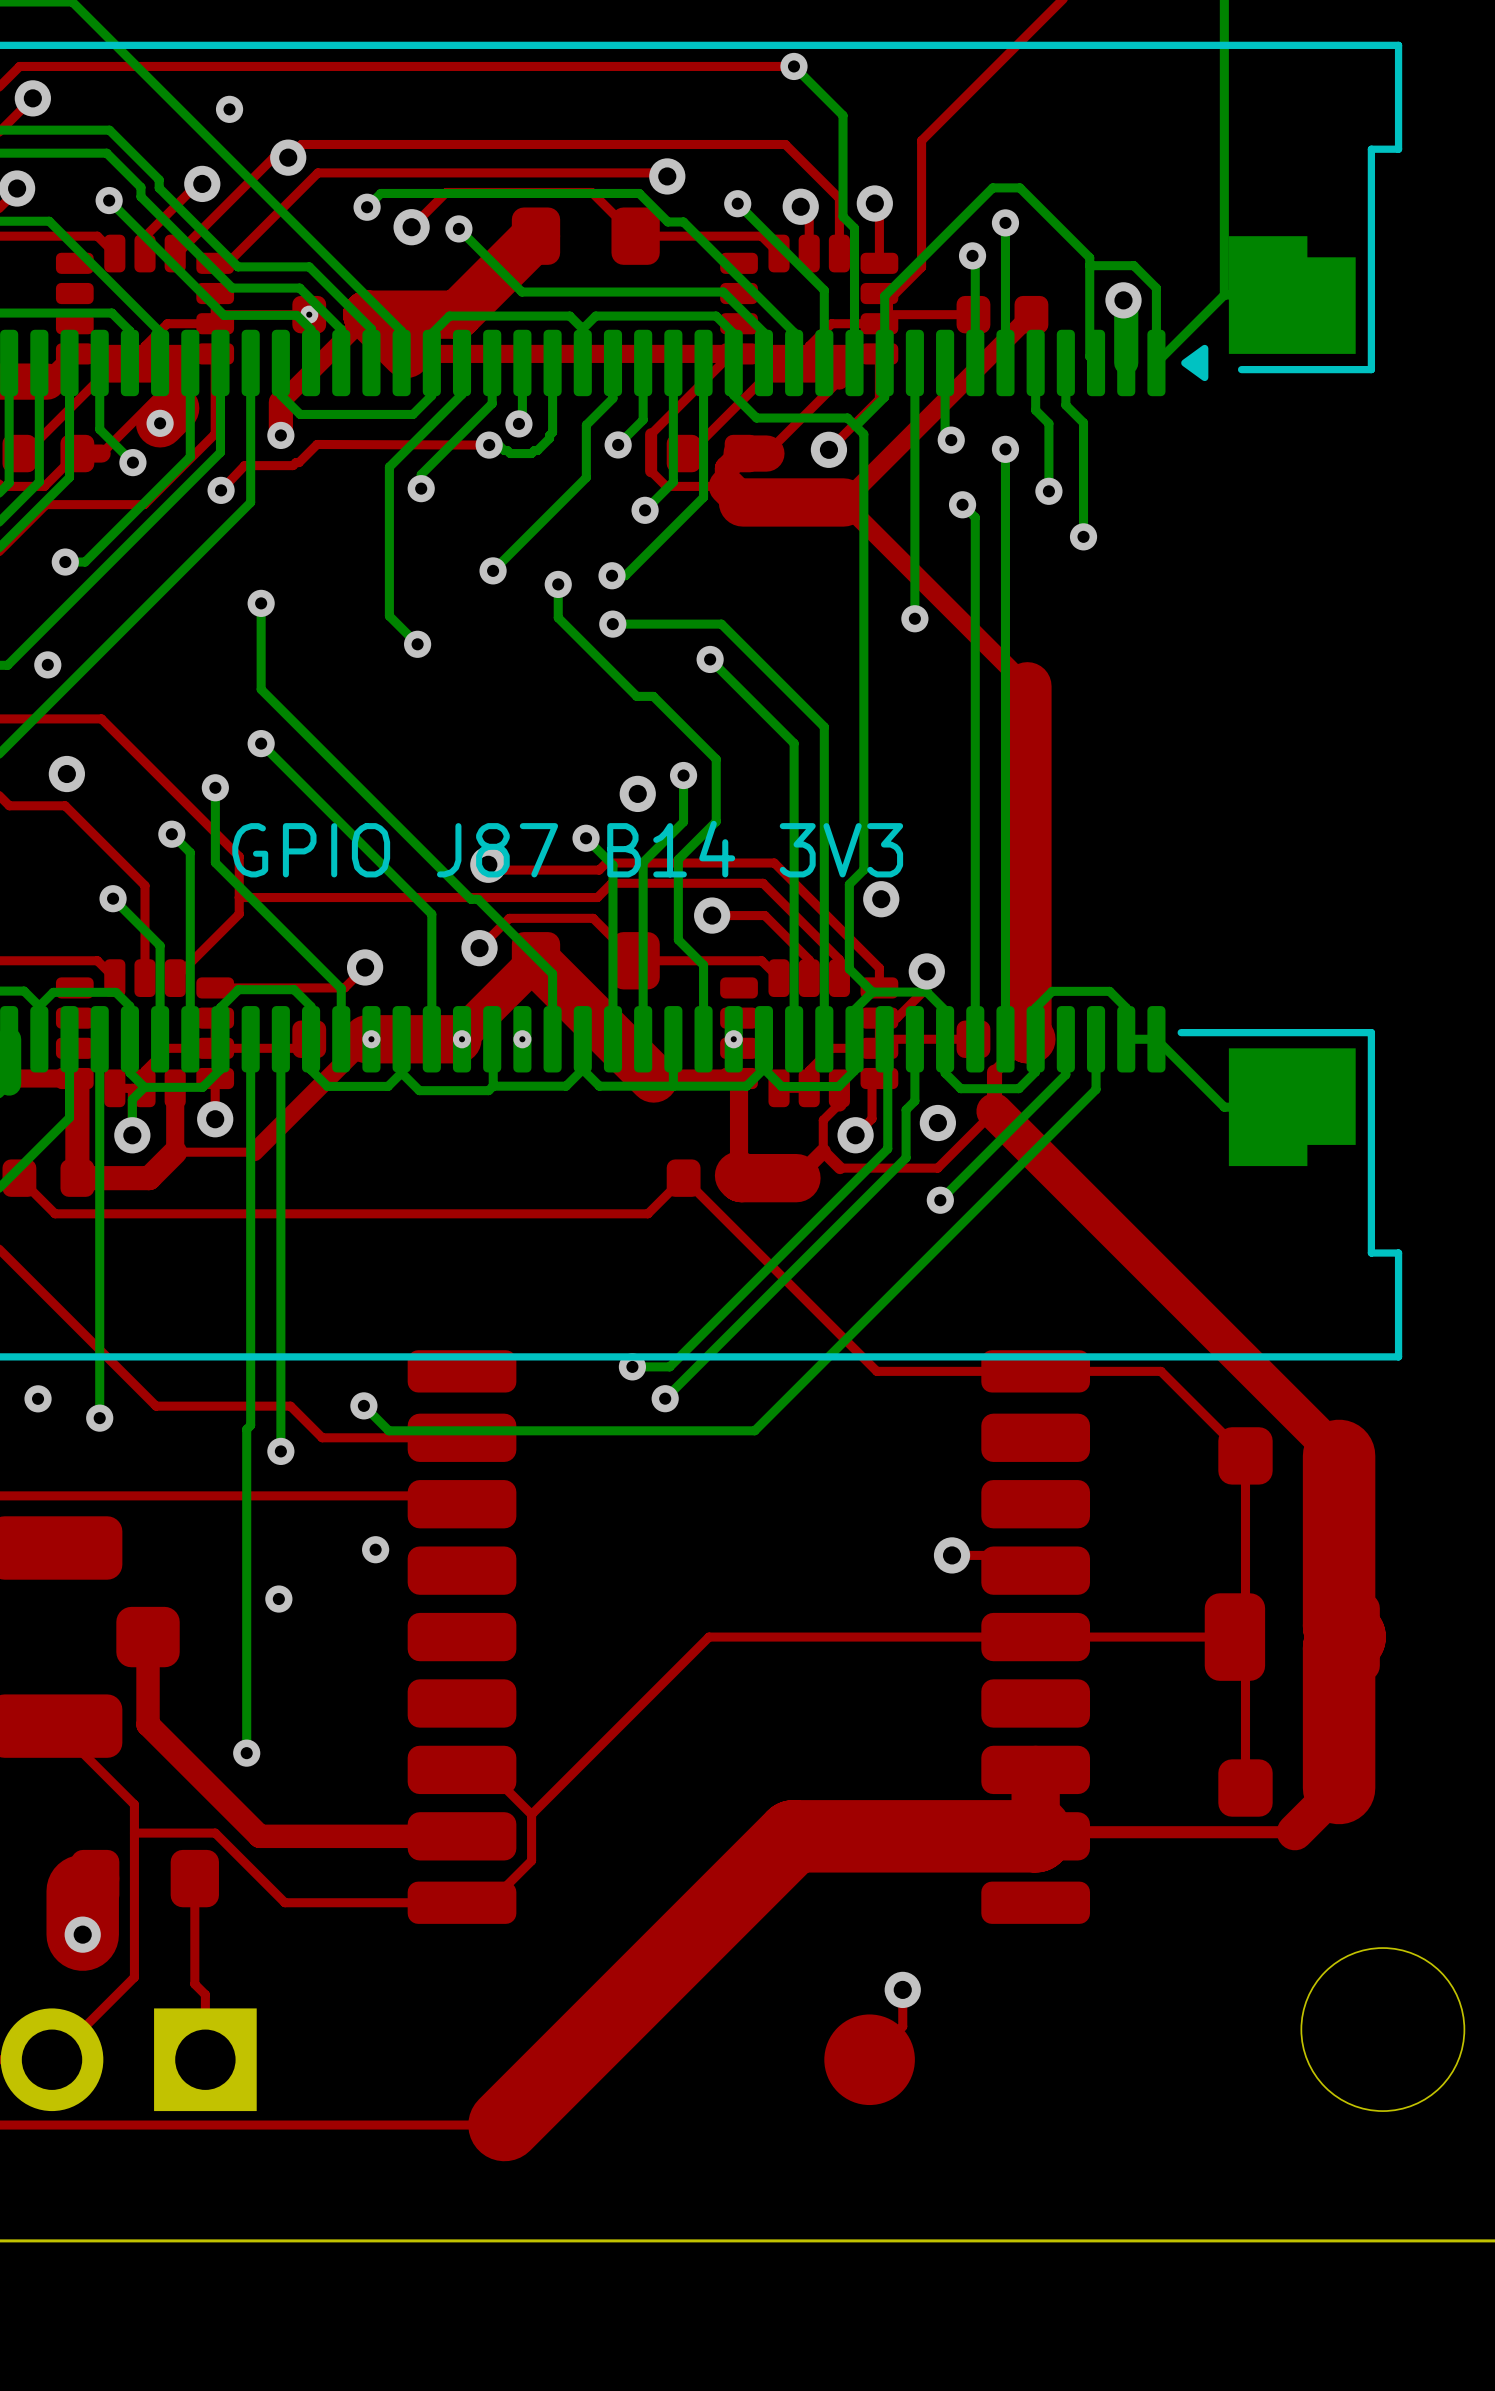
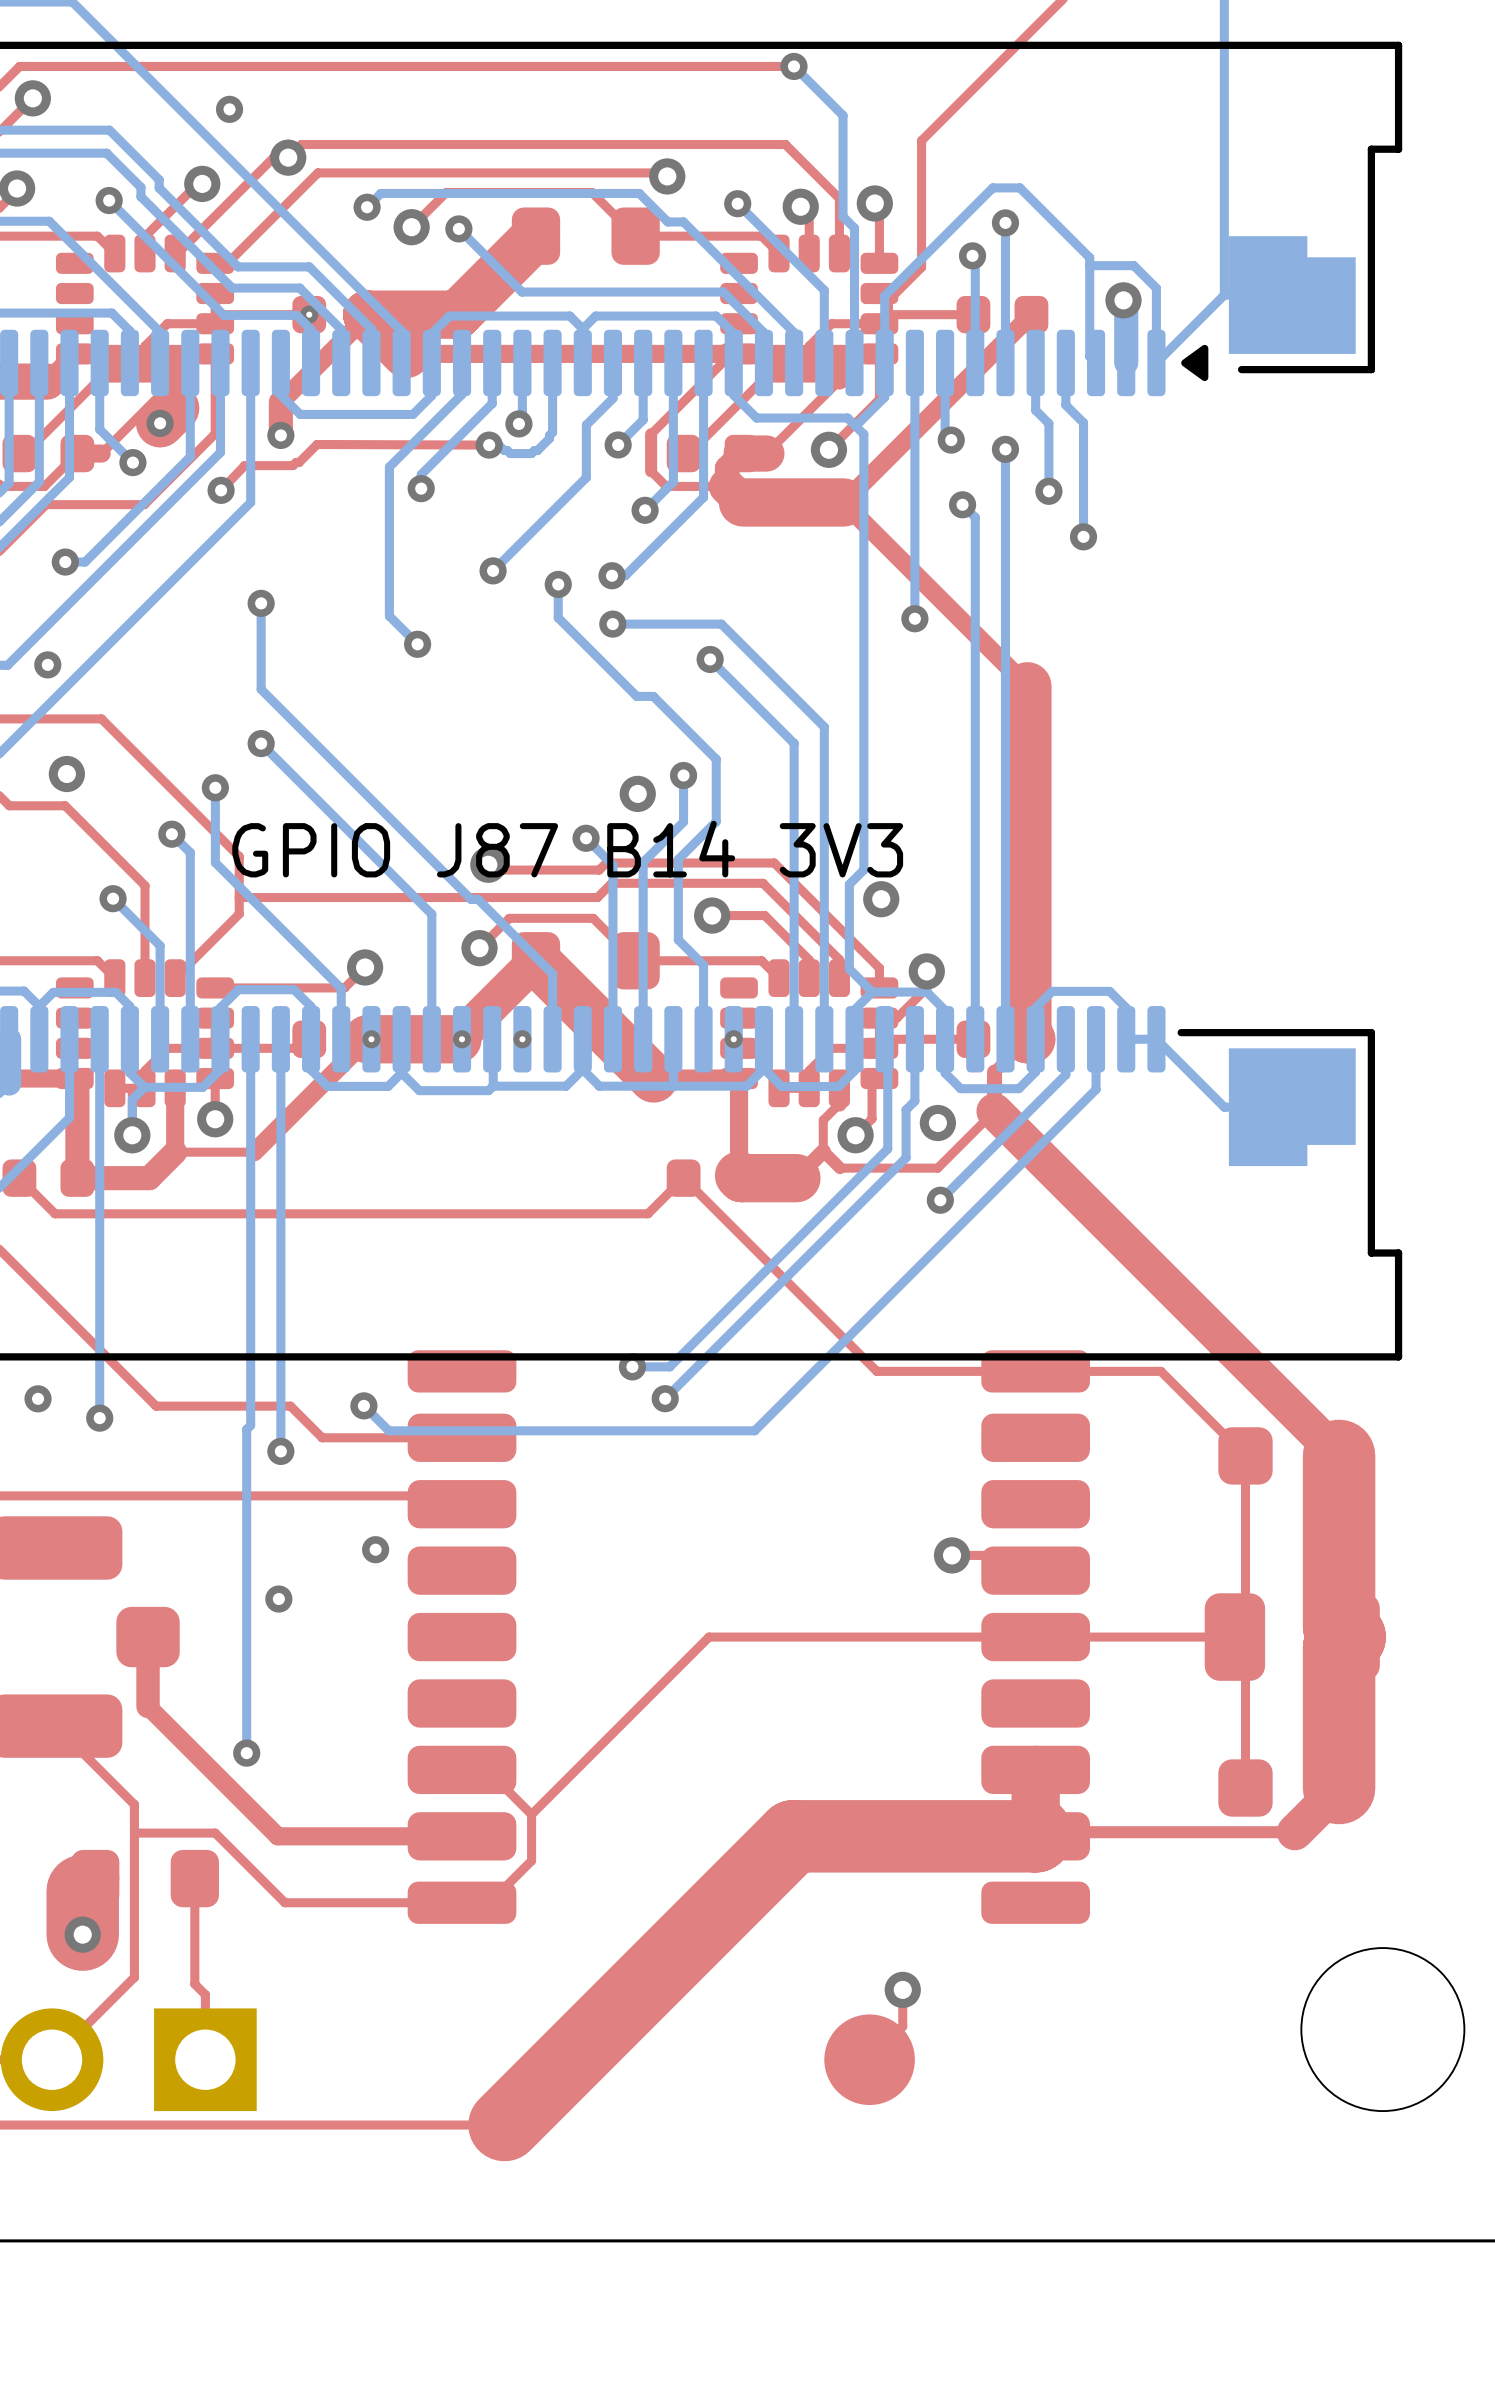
top track: (148, 1706) (148, 1724) (259, 1836) (277, 1836) -> (148, 1706) (277, 1836)
top track width: thick (462, 1836) (277, 1836) -> thin (462, 1836) (277, 1836)

